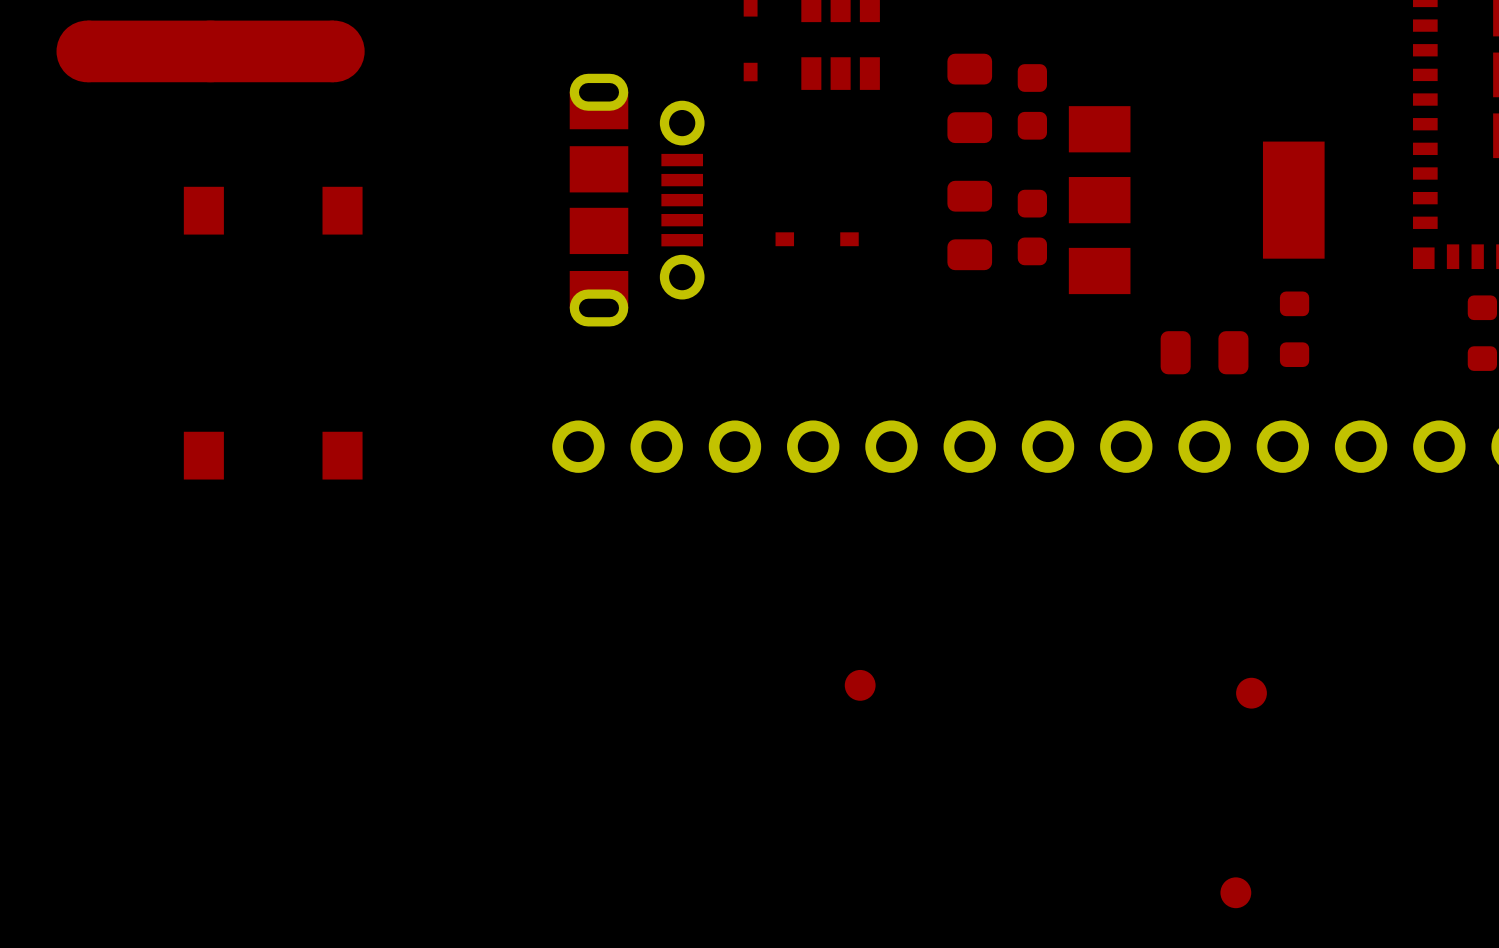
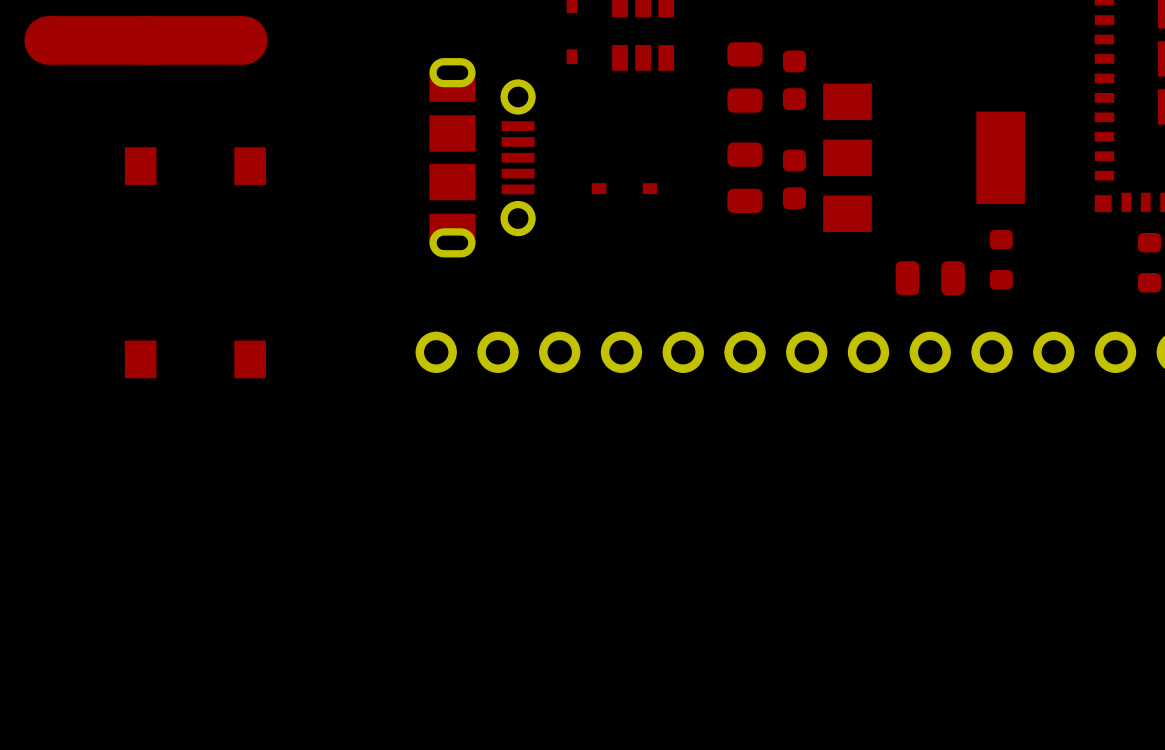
part: (860, 685) -> none
part: (1251, 693) -> none
part: (1235, 892) -> none

